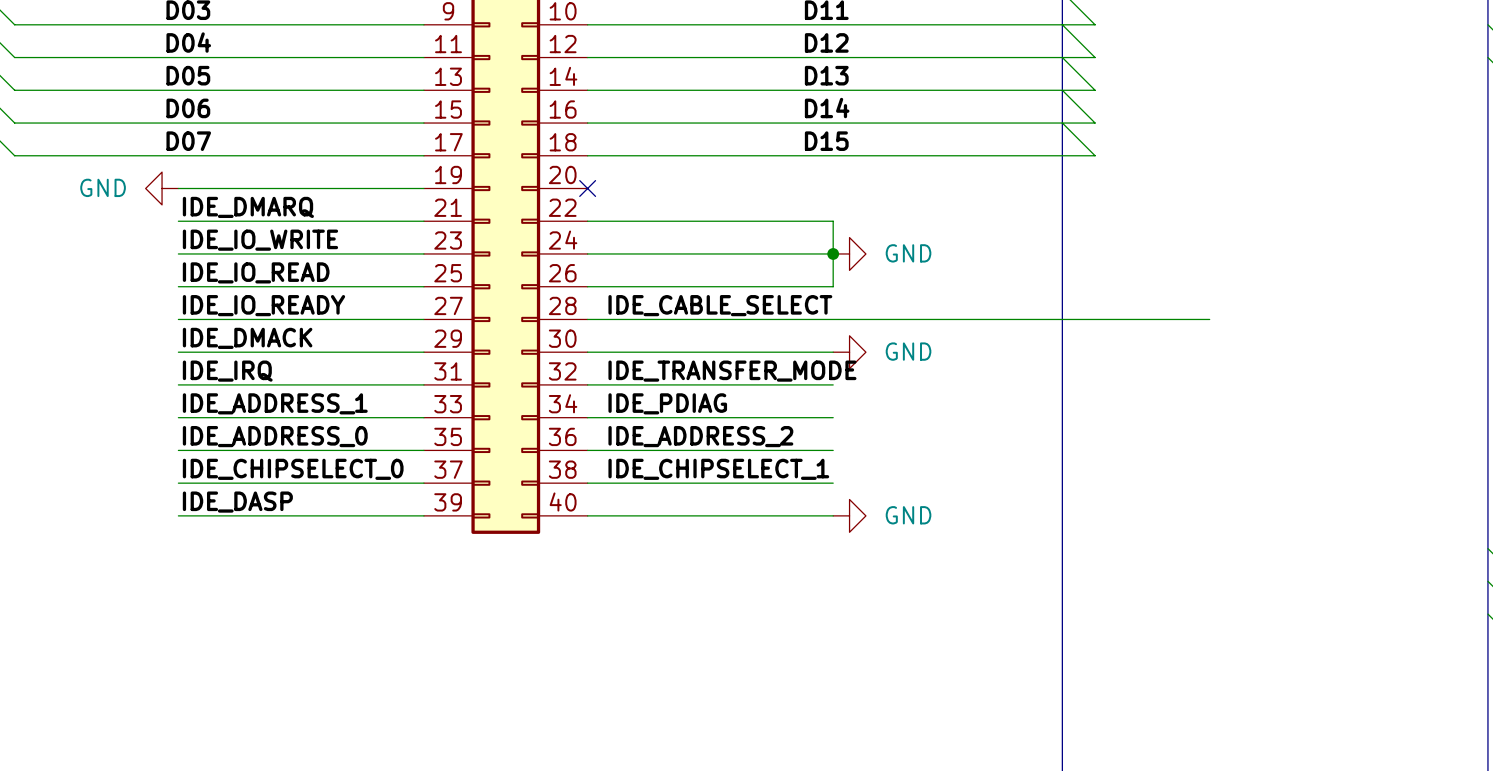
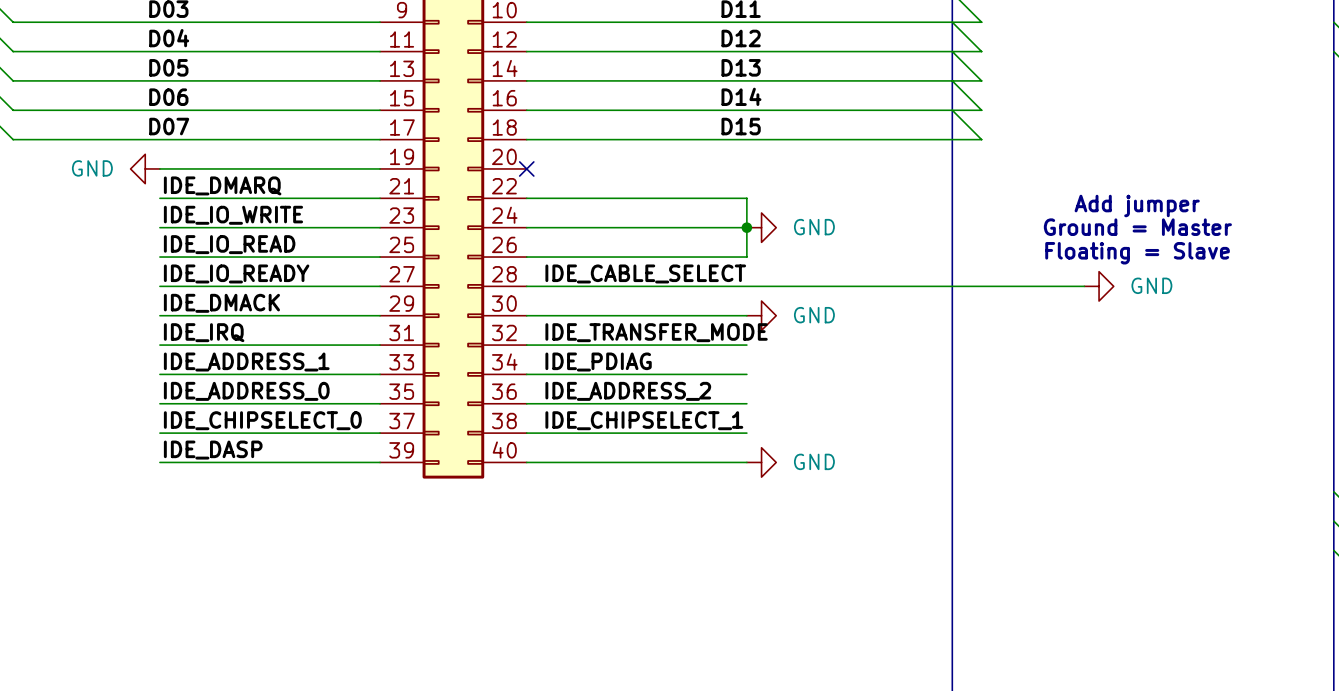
text: none -> Add jumper (1137, 205)
text: none -> Ground = Master (1137, 227)
text: none -> Floating = Slave (1137, 253)
power symbol: none -> GND (1099, 286)

